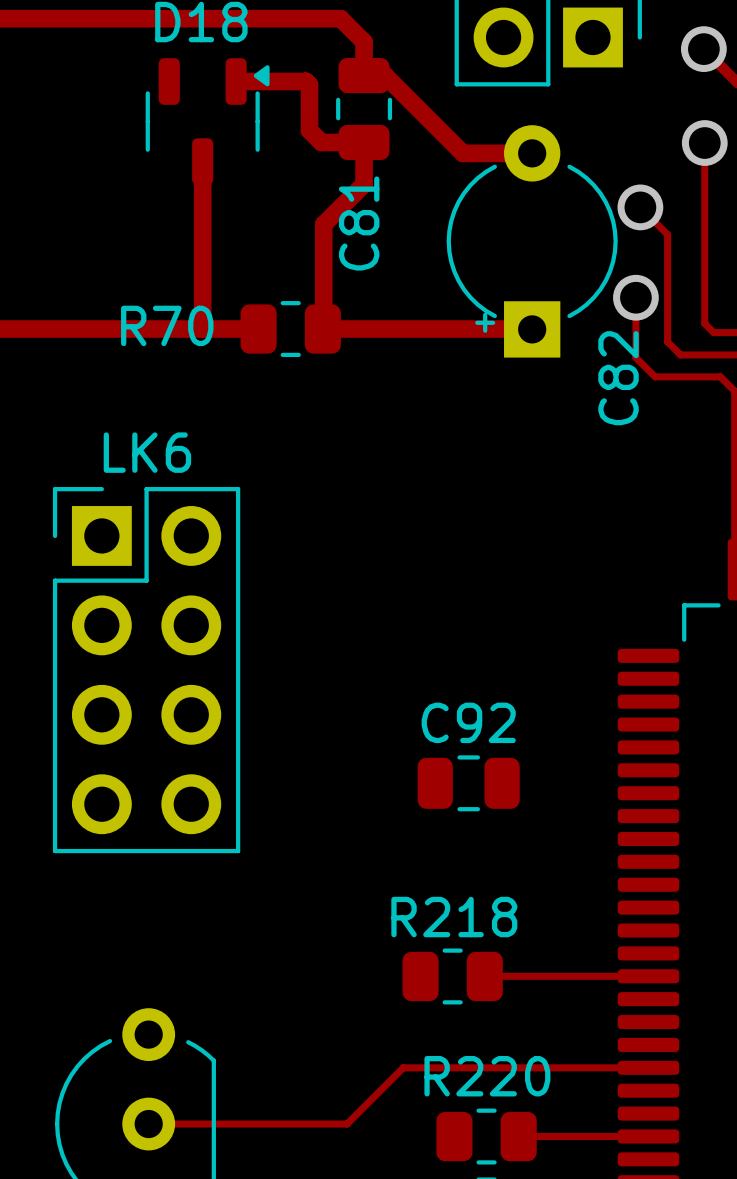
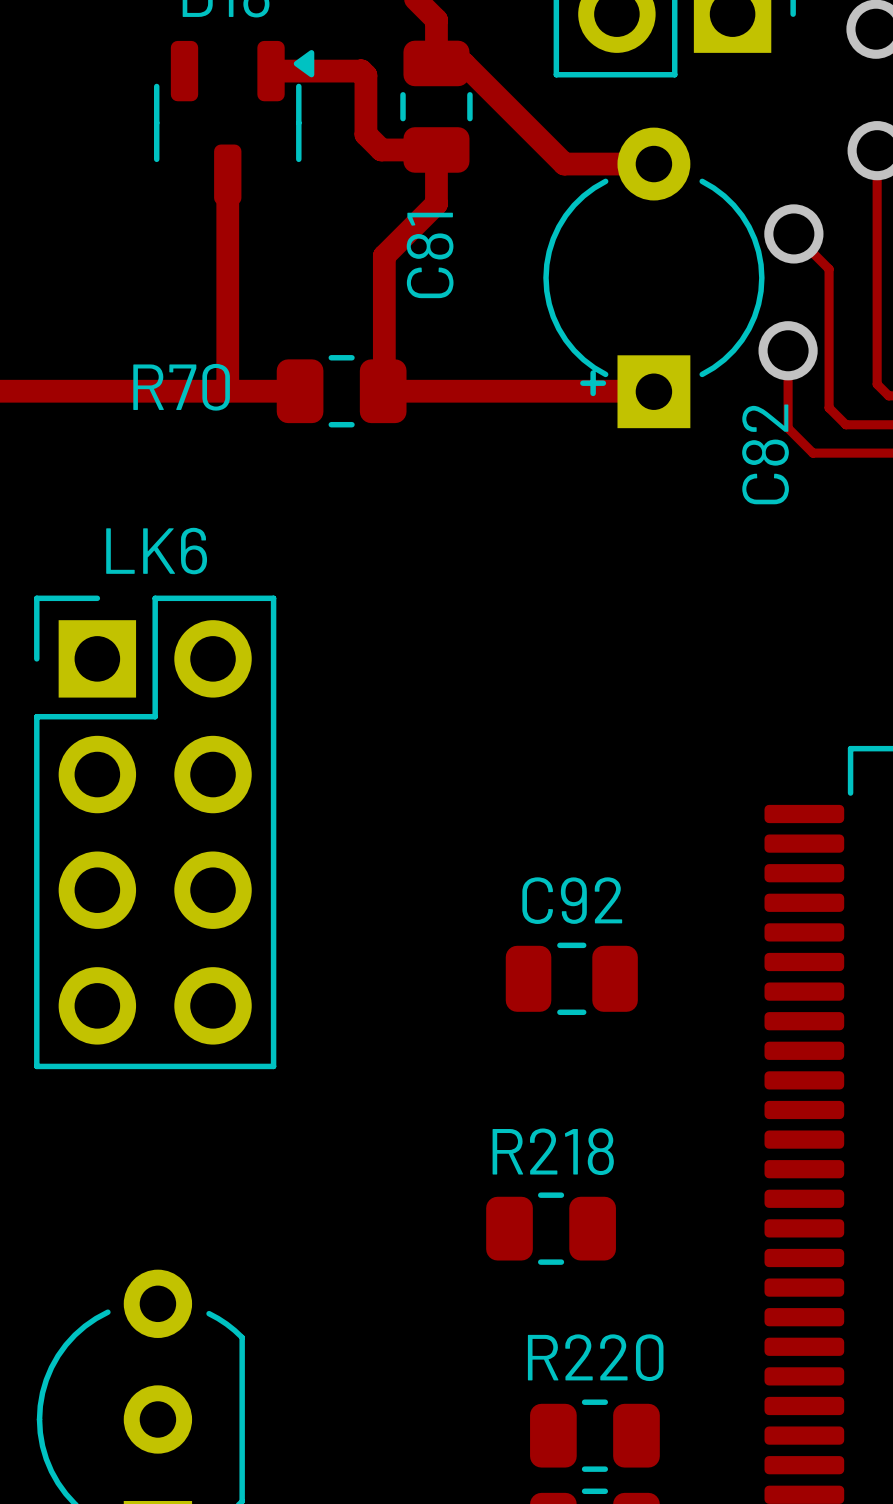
top track: (484, 976) (648, 976) -> none
top track: (648, 1067) (403, 1067) (347, 1124) (148, 1124) -> none
top track: (518, 1136) (648, 1136) -> none

